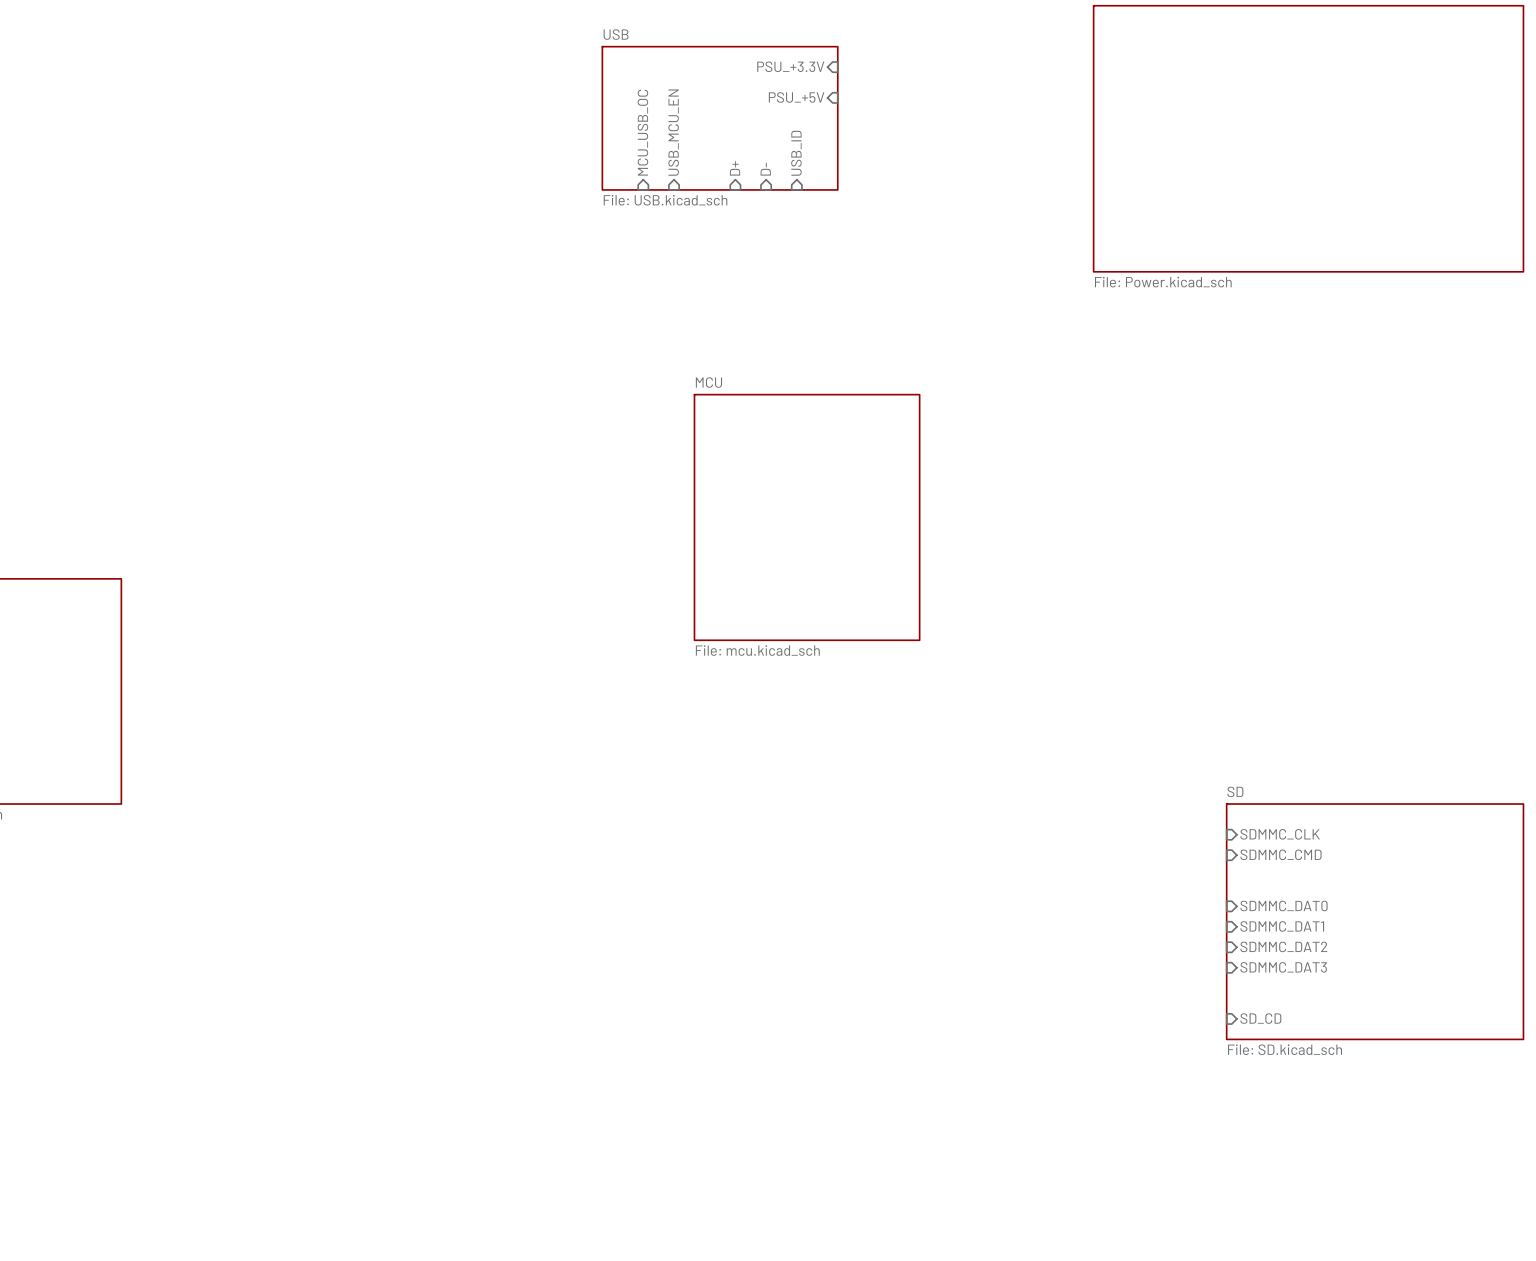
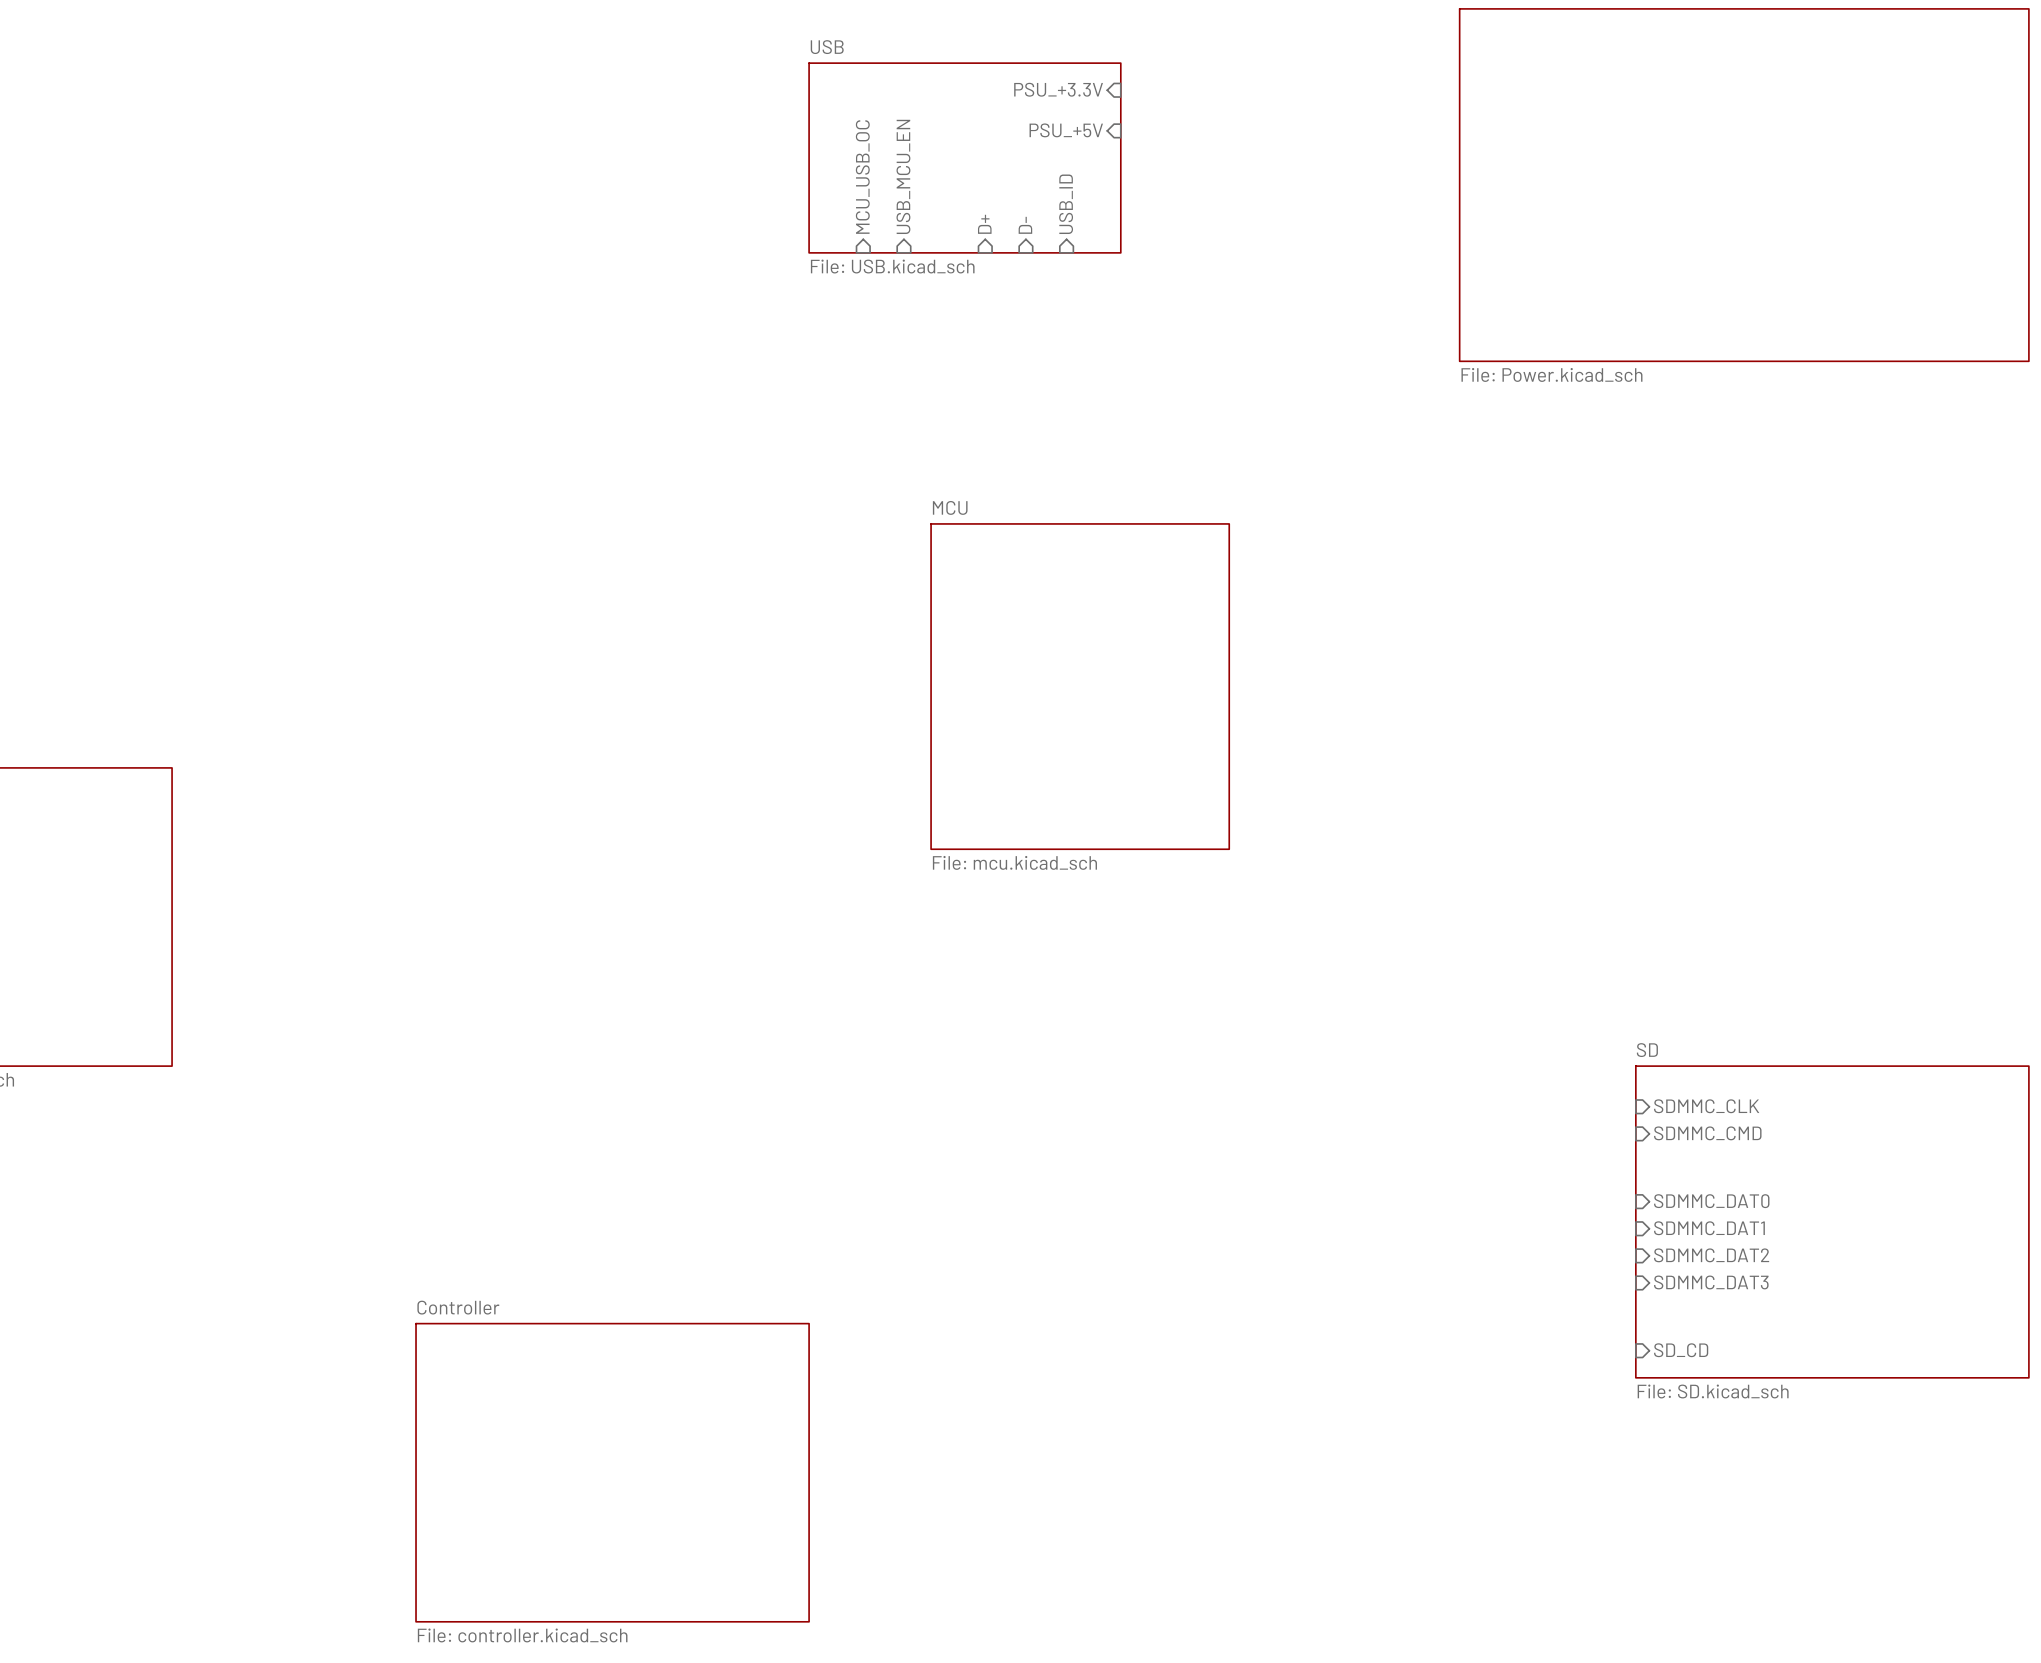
sheet Controller: none -> File: controller.kicad_sch (612, 1472)

